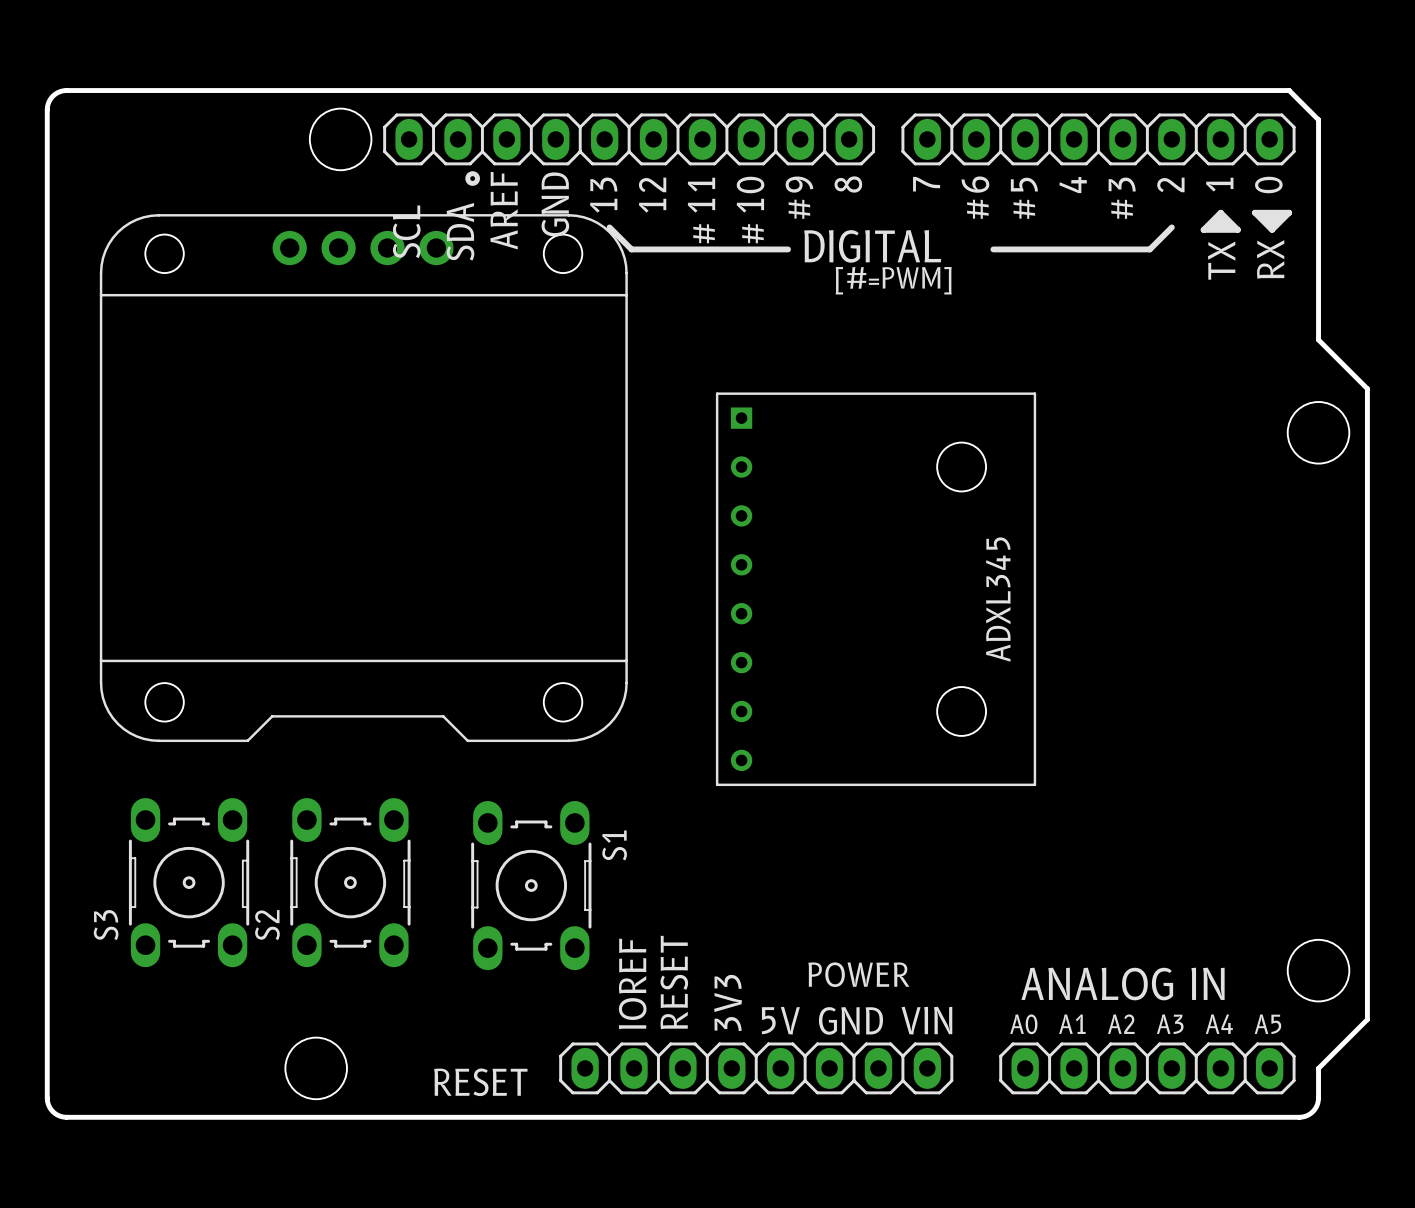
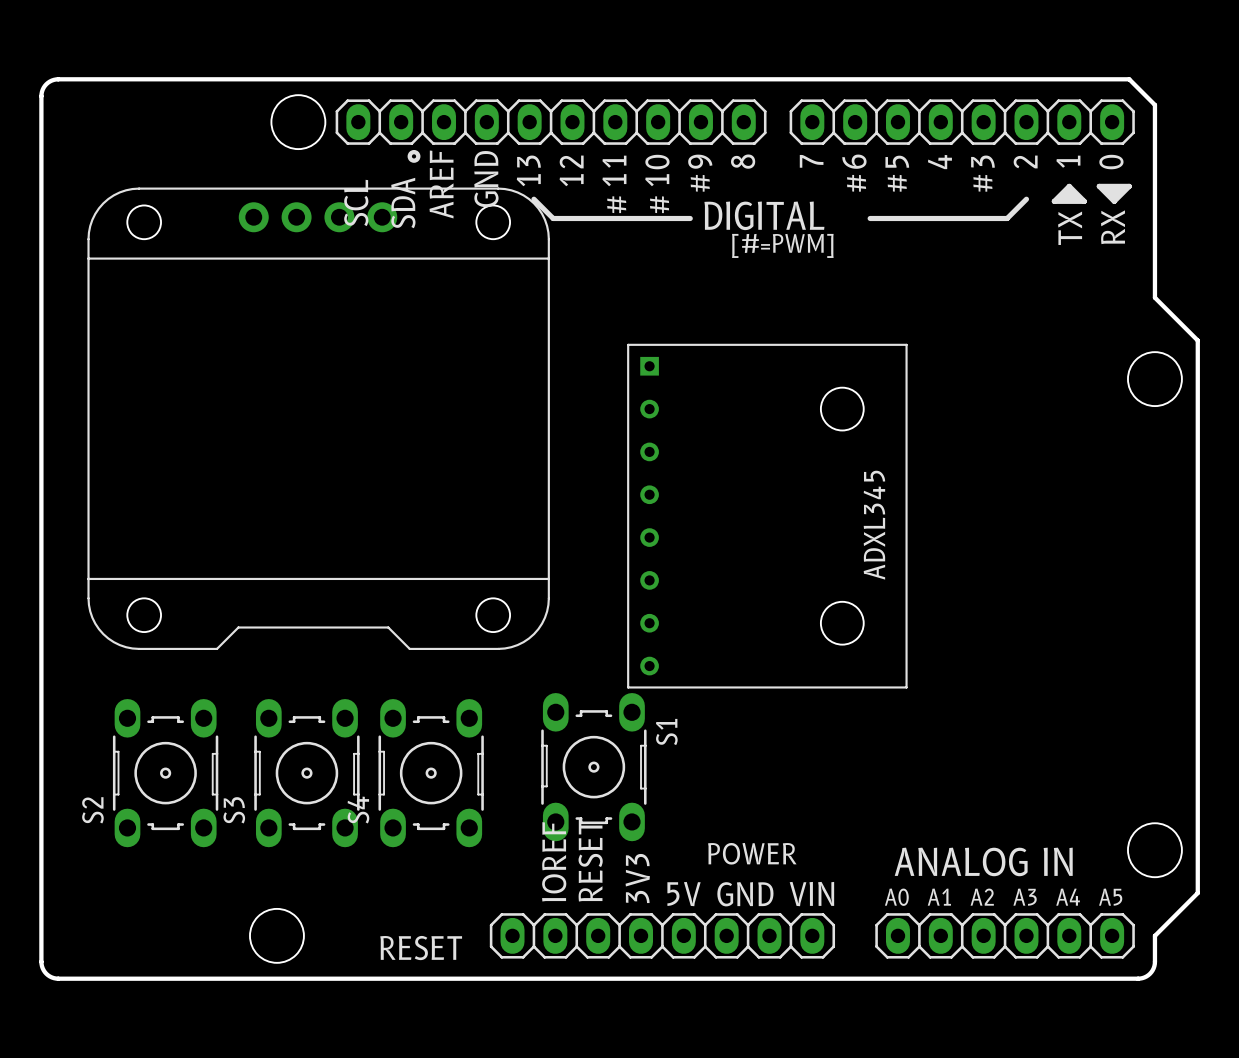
S4: none -> (431, 773)
S1 position: (531, 885) -> (593, 767)
S3 name: S3 (106, 925) -> S2 (92, 810)
S2 name: S2 (267, 925) -> S3 (234, 810)

